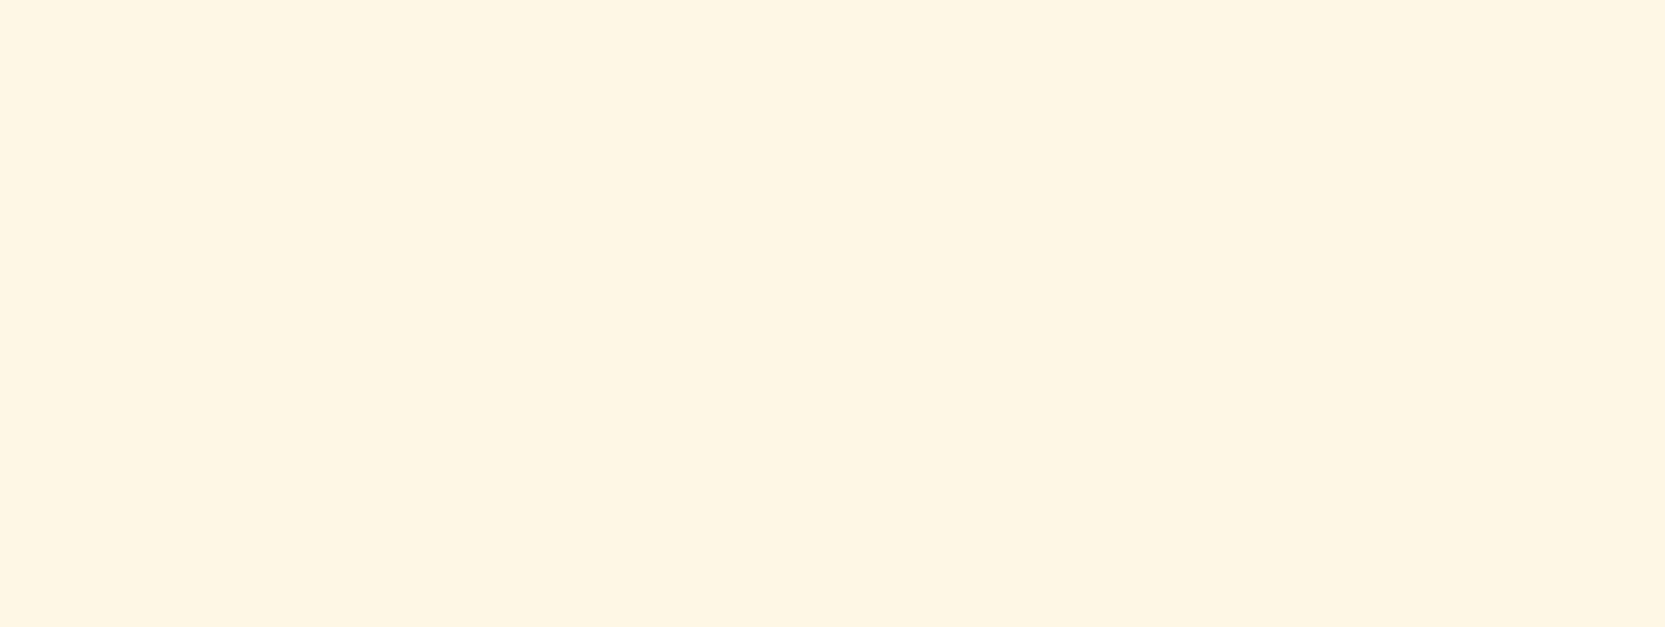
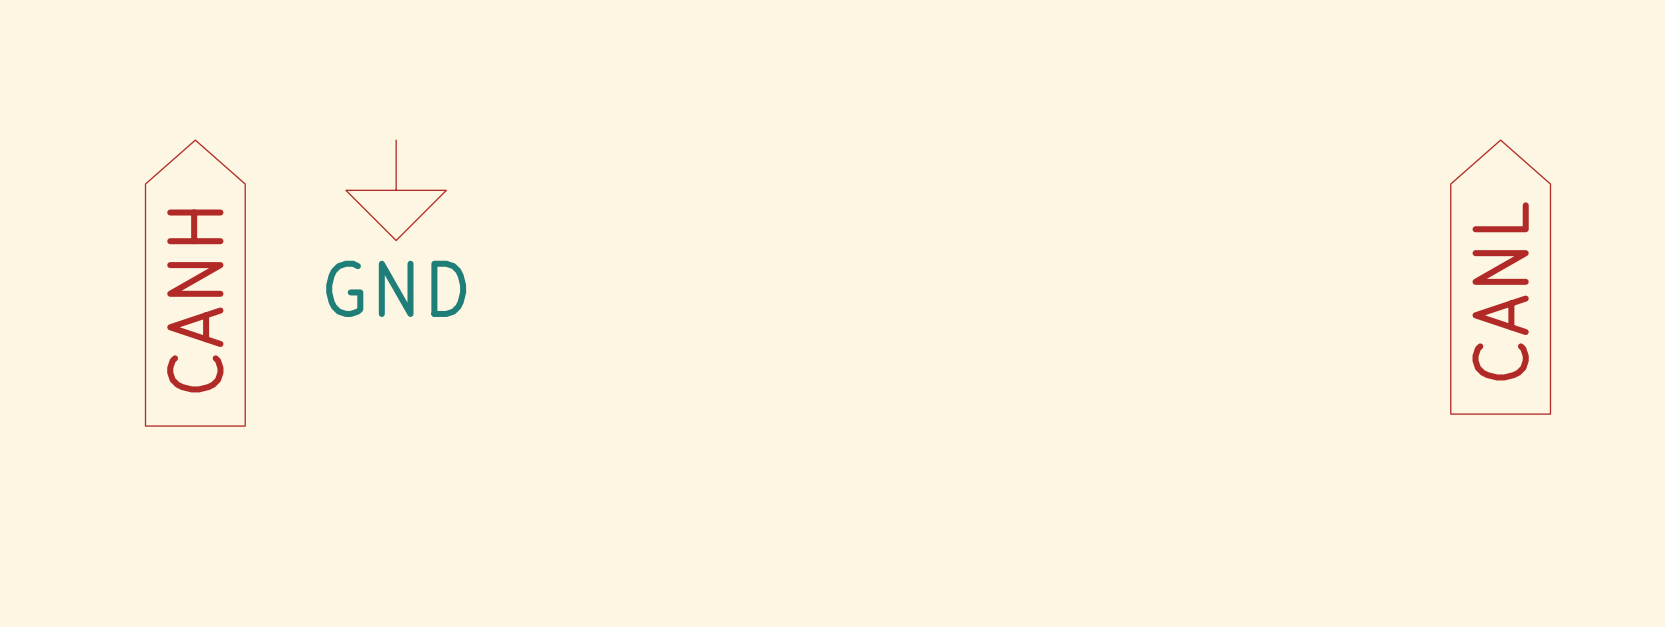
power symbol: none -> GND (396, 190)
global label: none -> CANL (1500, 291)
global label: none -> CANH (195, 300)

